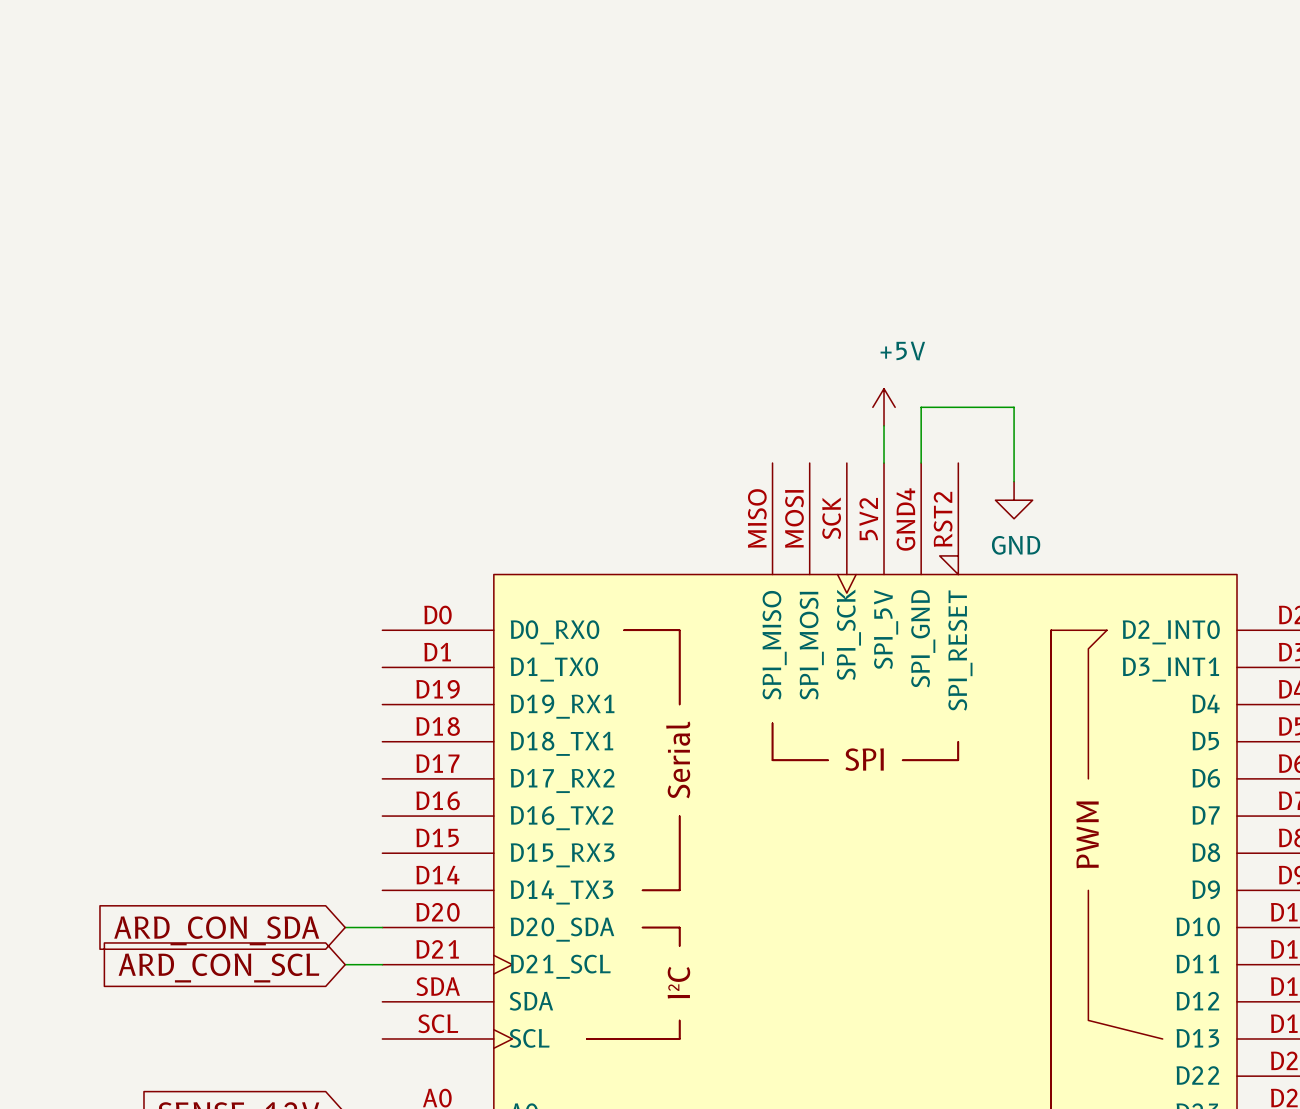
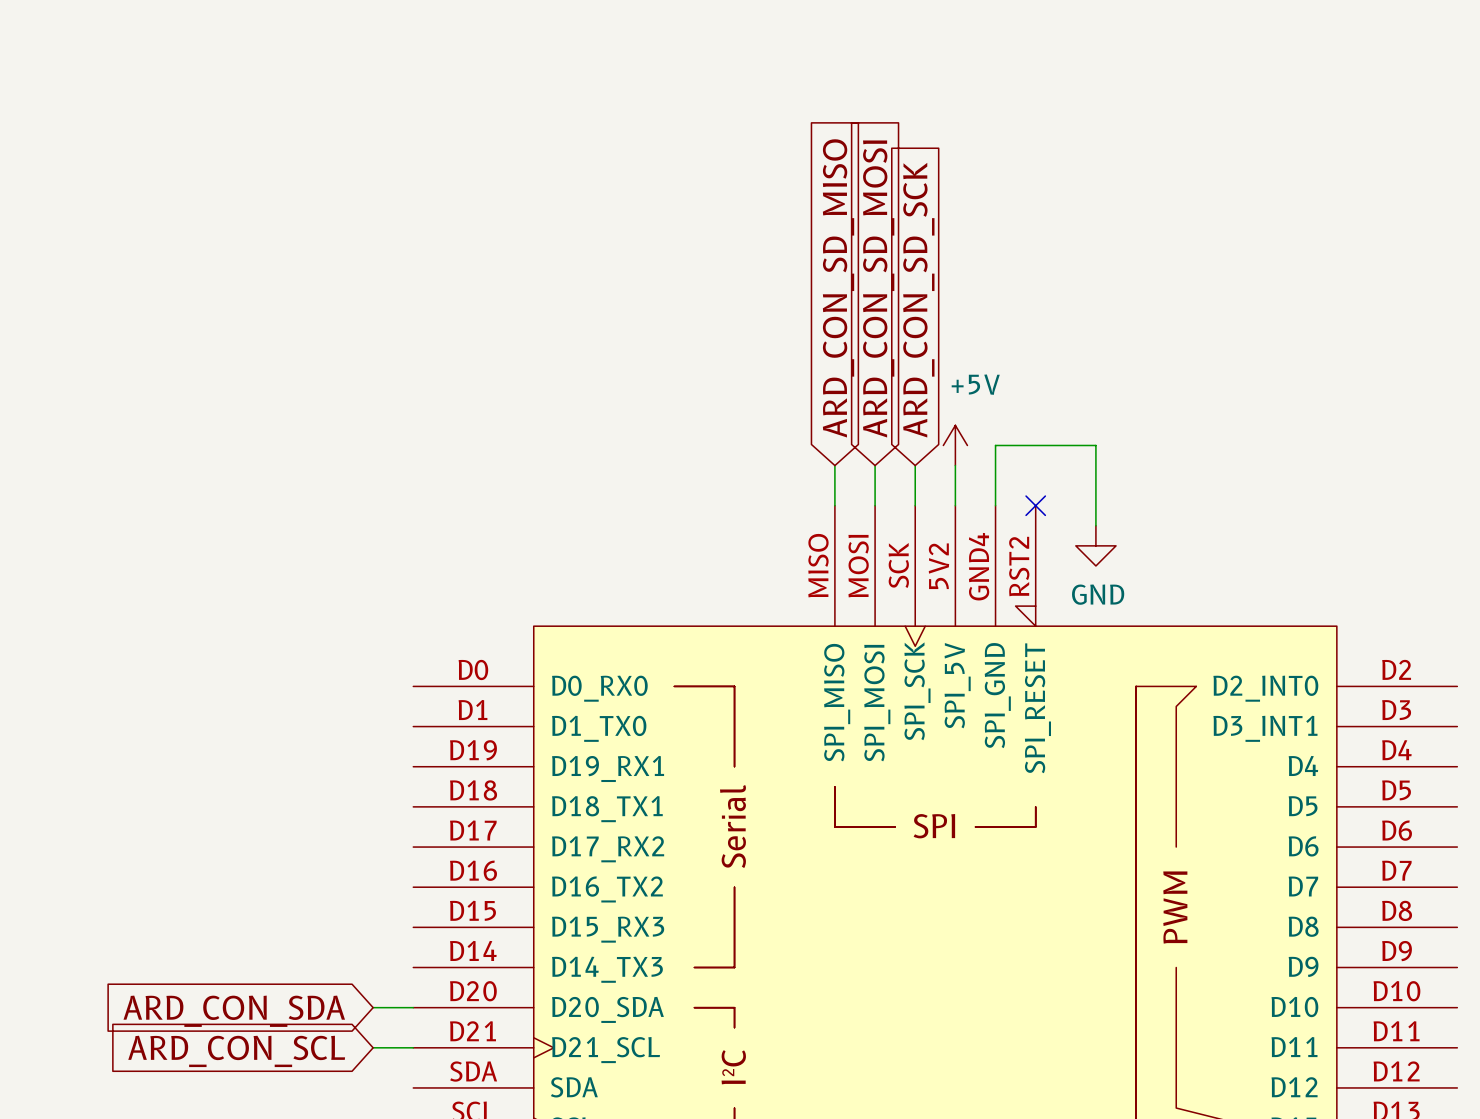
global label: none -> ARD_CON_SD_MISO (838, 288)
global label: none -> ARD_CON_SD_MOSI (878, 288)
global label: none -> ARD_CON_SD_SCK (918, 300)
wire: none -> (834, 465) (834, 505)
wire: none -> (875, 465) (875, 505)
wire: none -> (915, 465) (915, 505)
no-connect mark: none -> (1035, 505)

